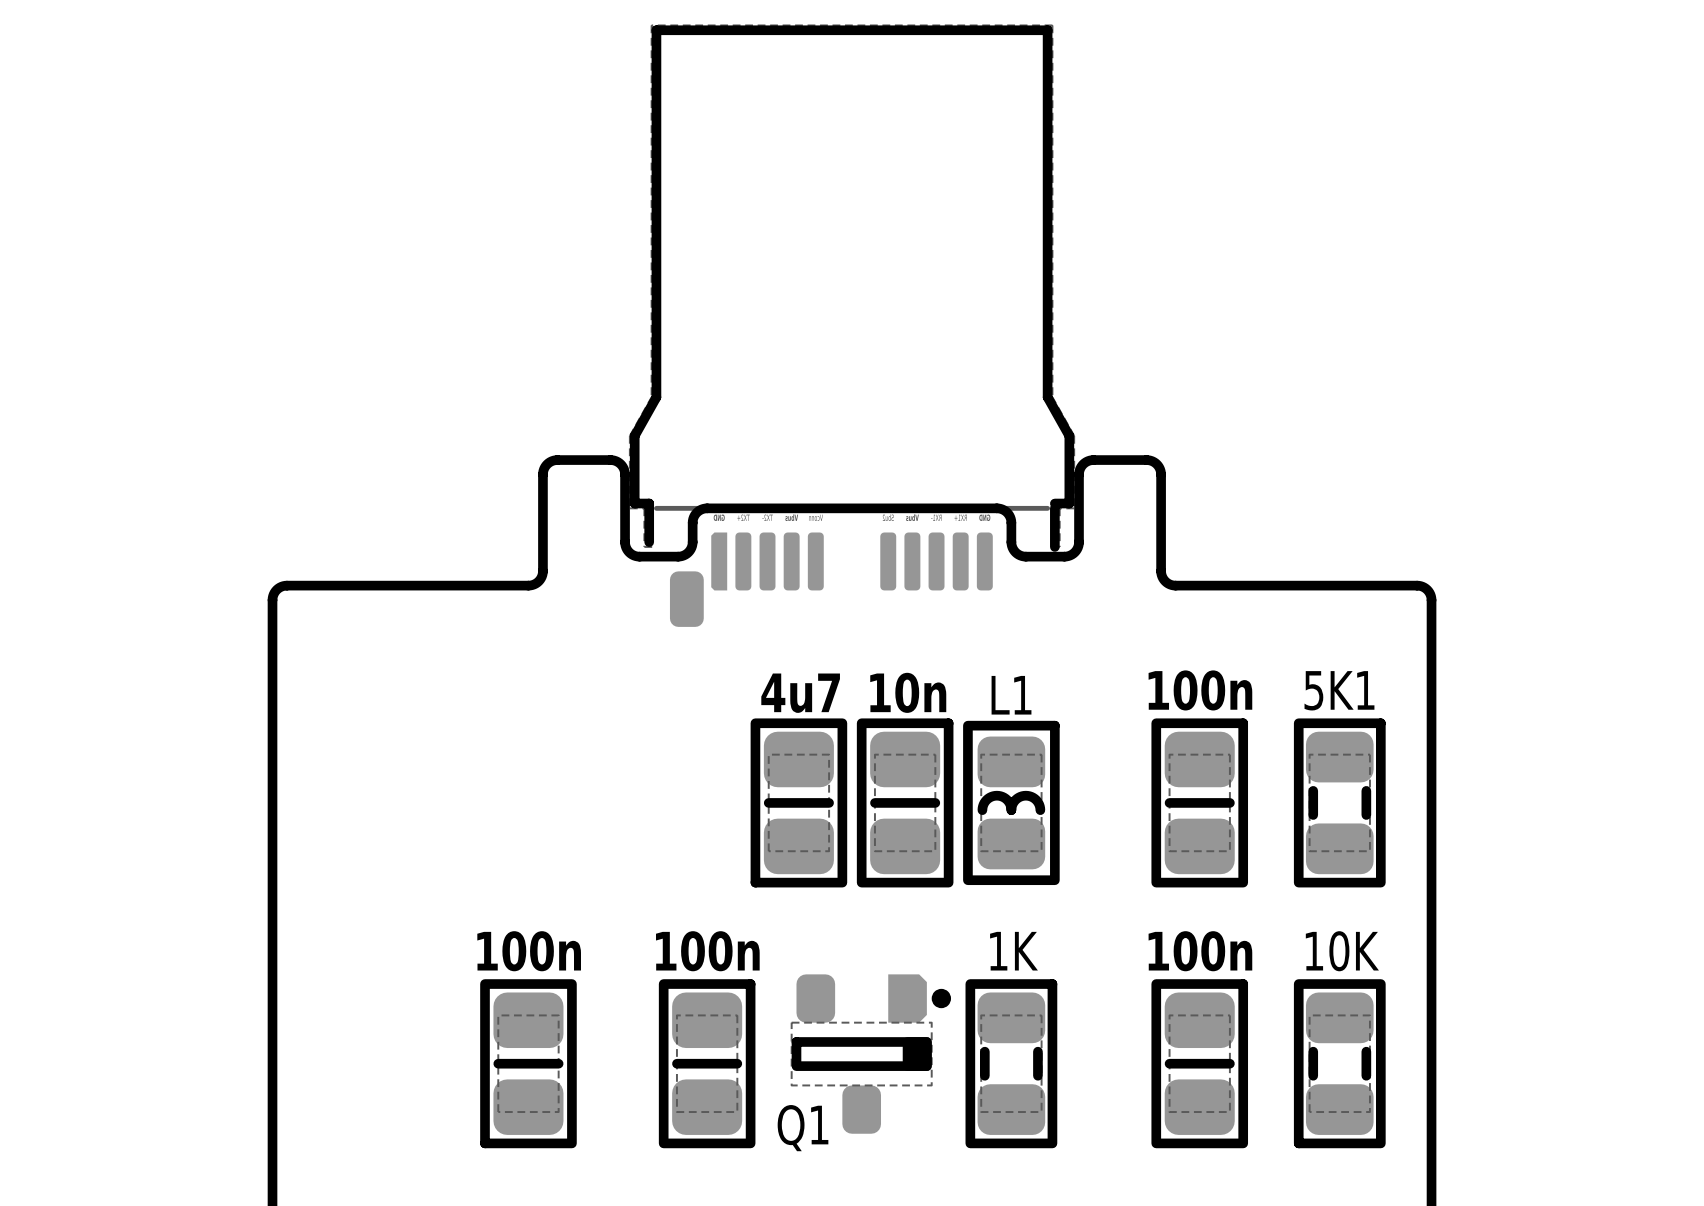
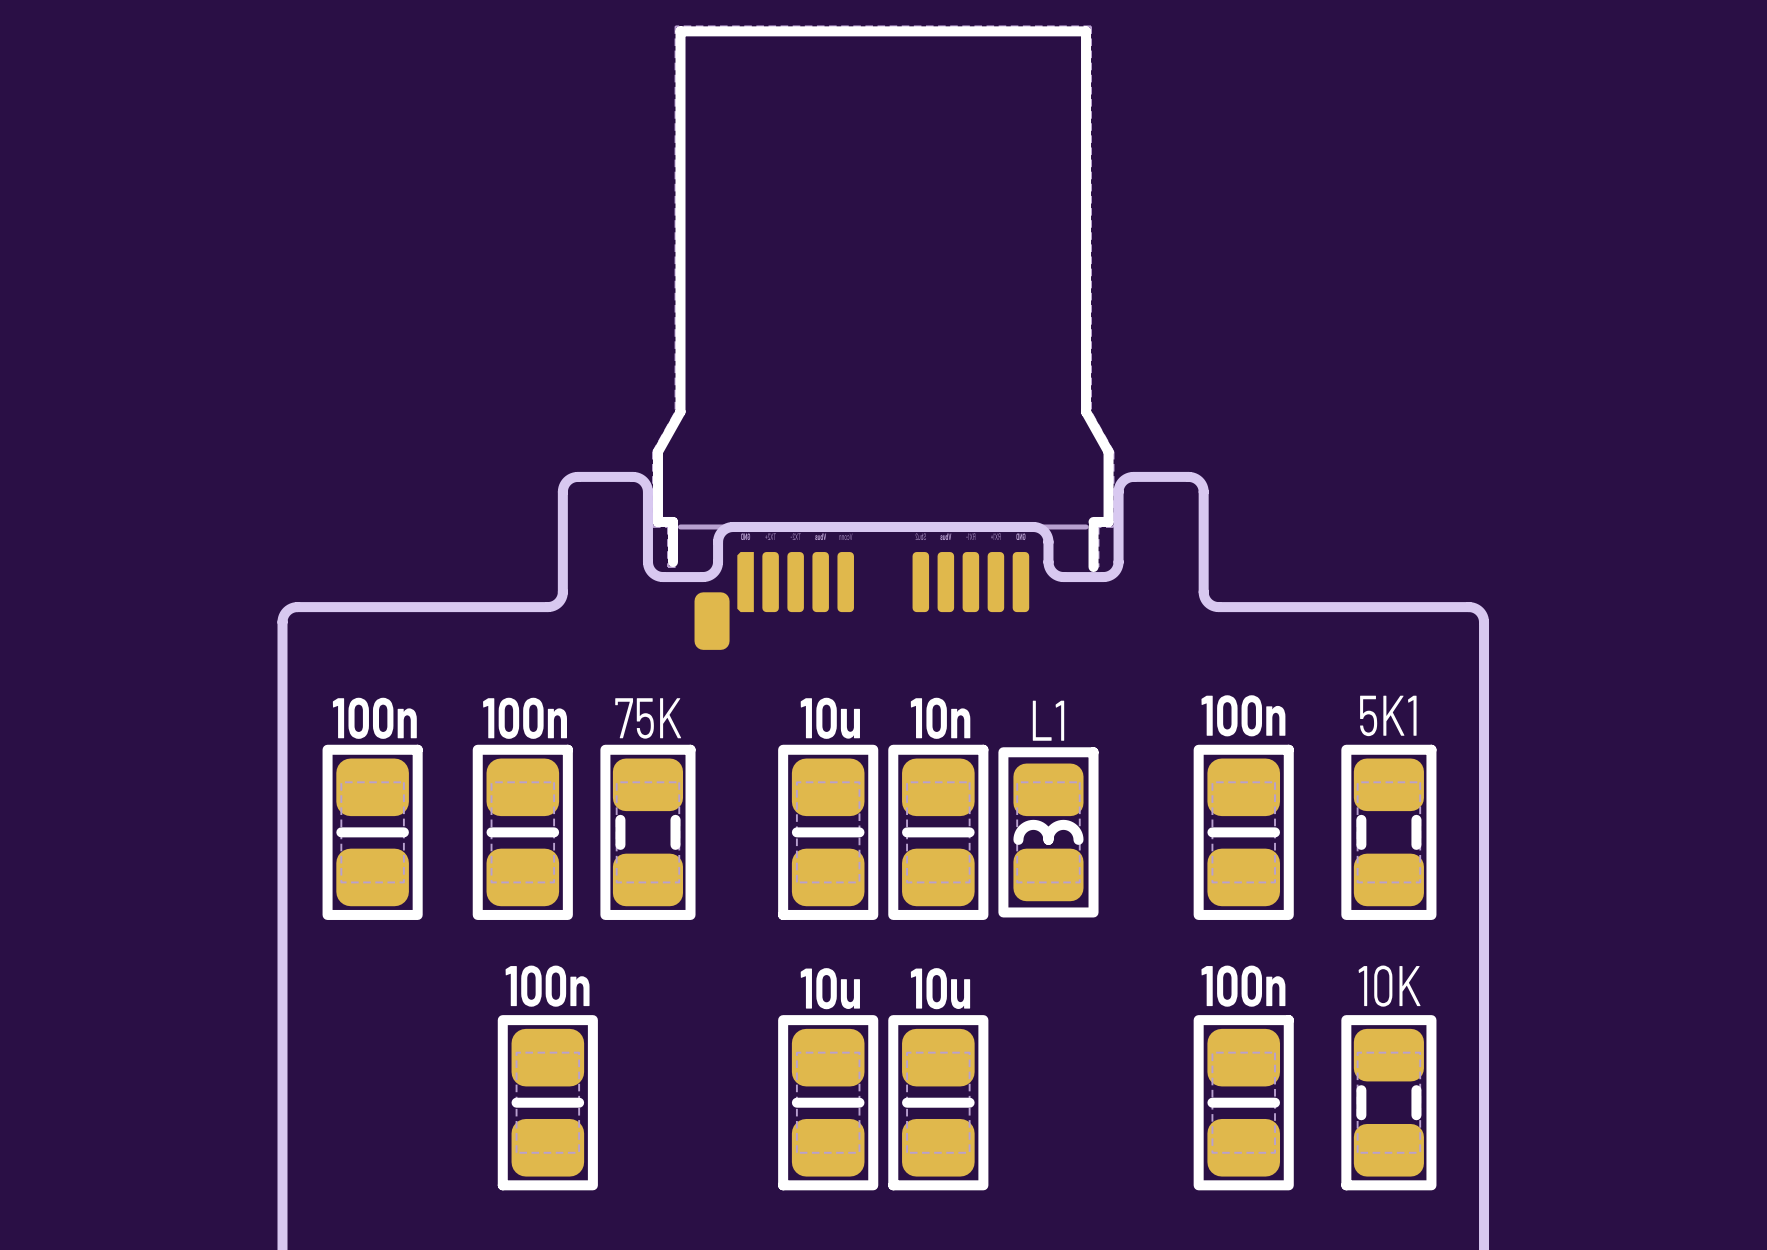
part value: 4u7 (800, 693) -> 10u (830, 718)
part: none -> 100n (372, 832)
part: none -> 100n (522, 832)
part: none -> 75K (647, 832)
Q1: (871, 1054) -> none
part: 100n (707, 1063) -> none
part: none -> 10u (828, 1102)
part: none -> 10u (938, 1102)
part: 1K (1011, 1063) -> none

